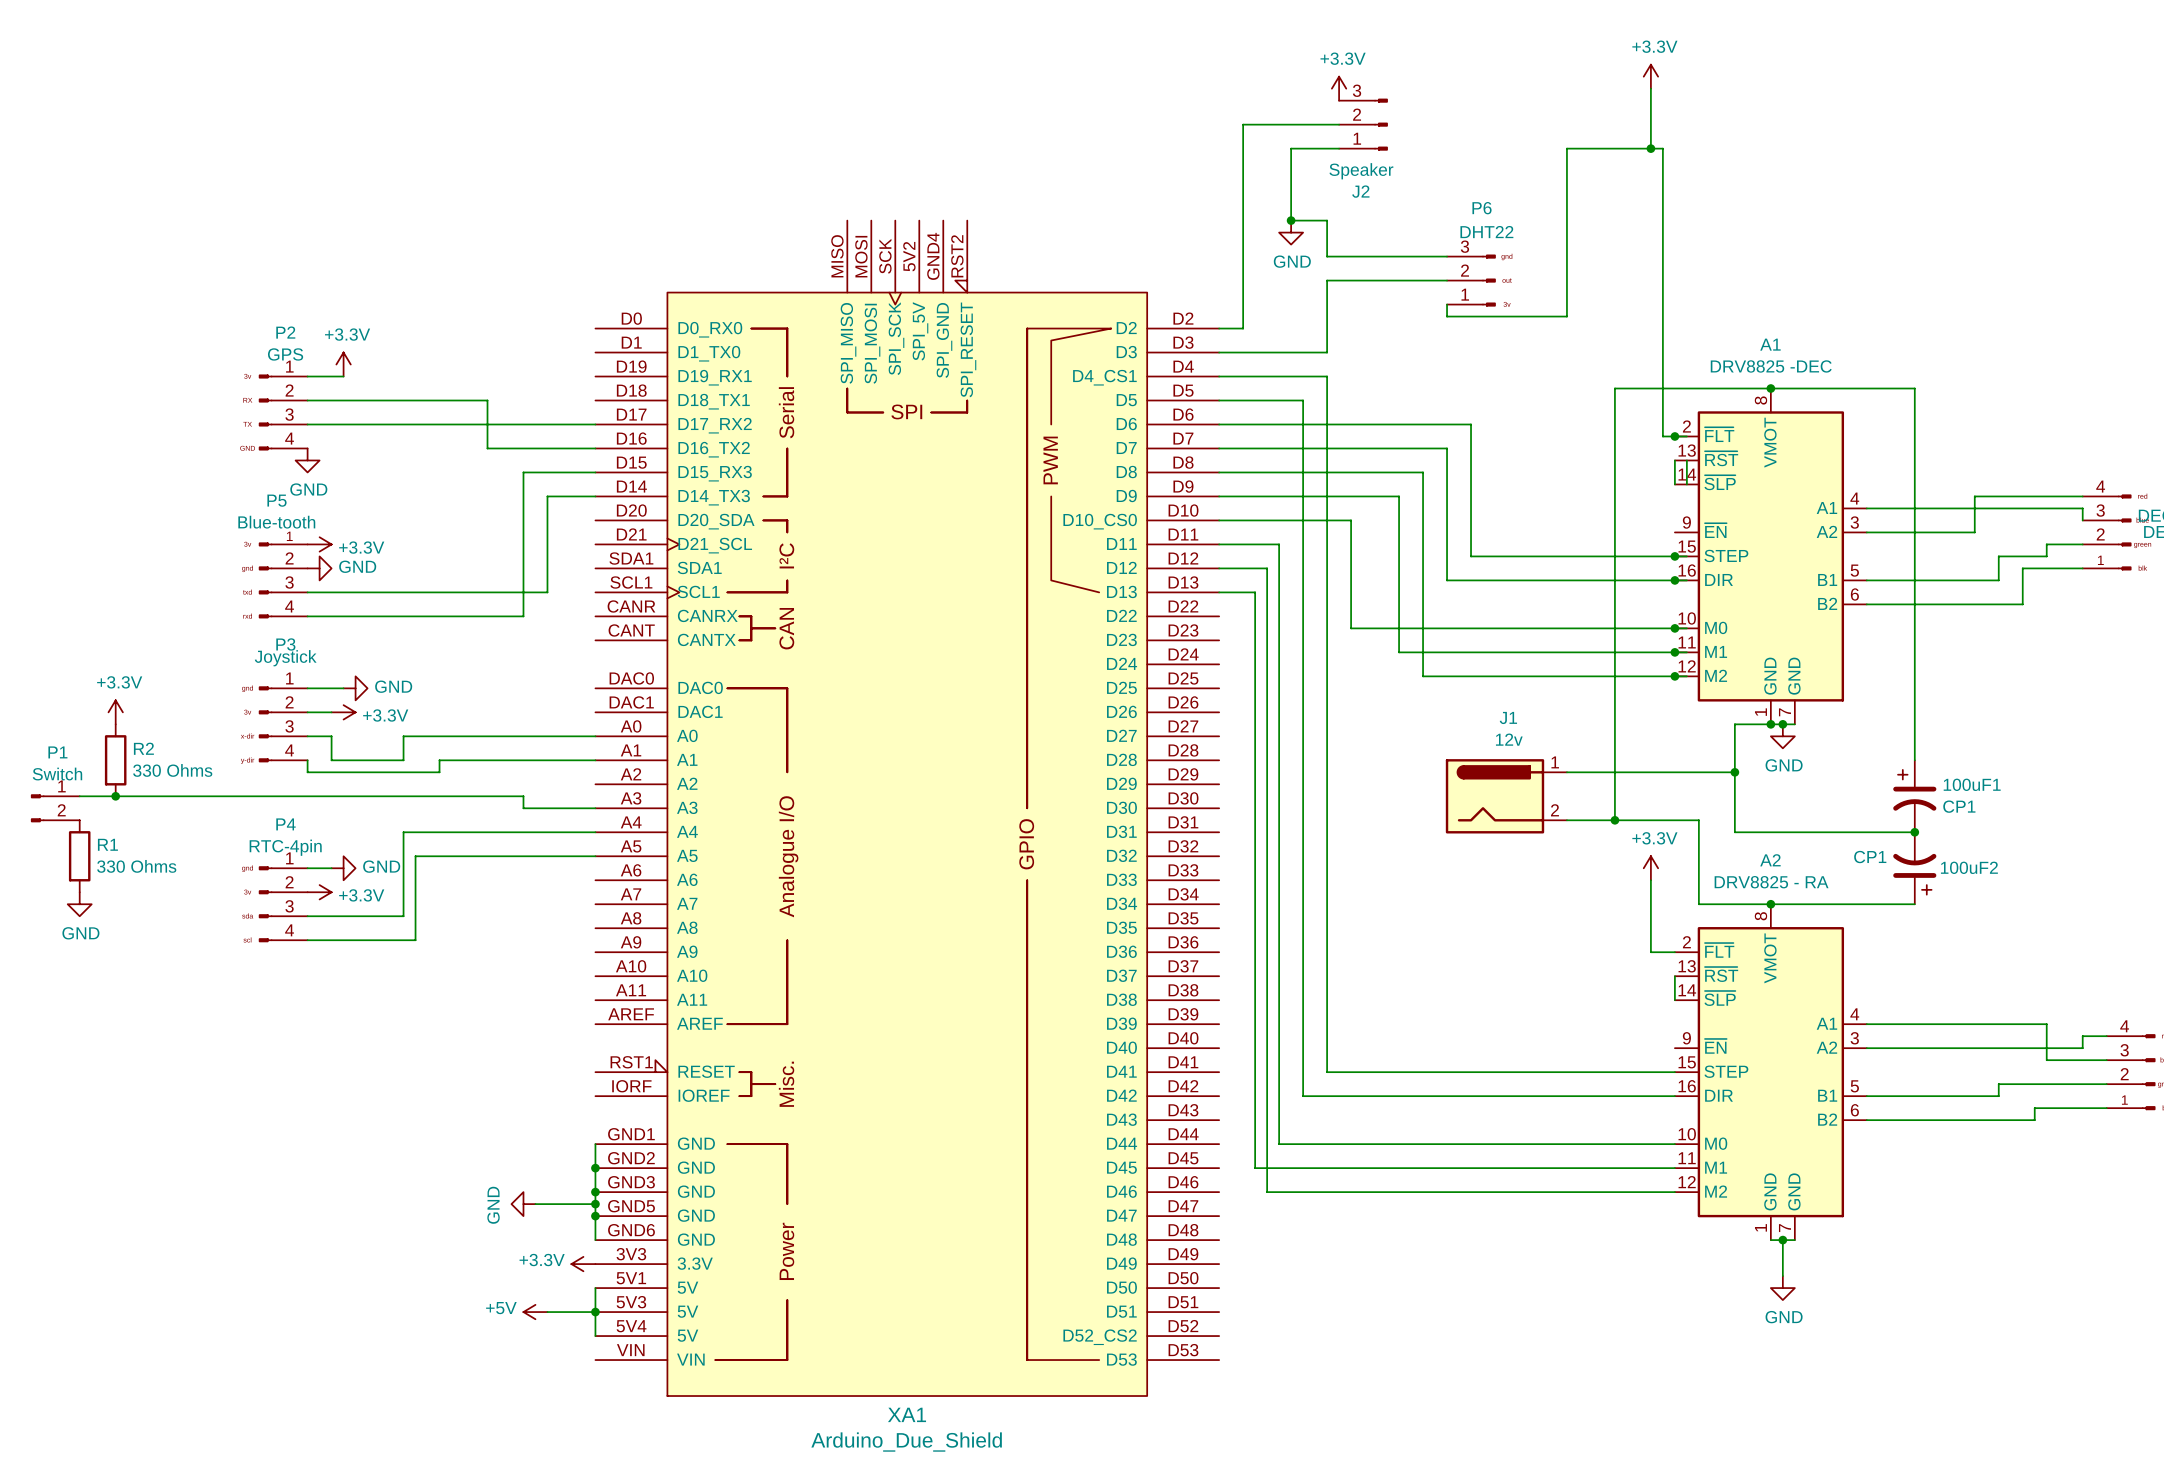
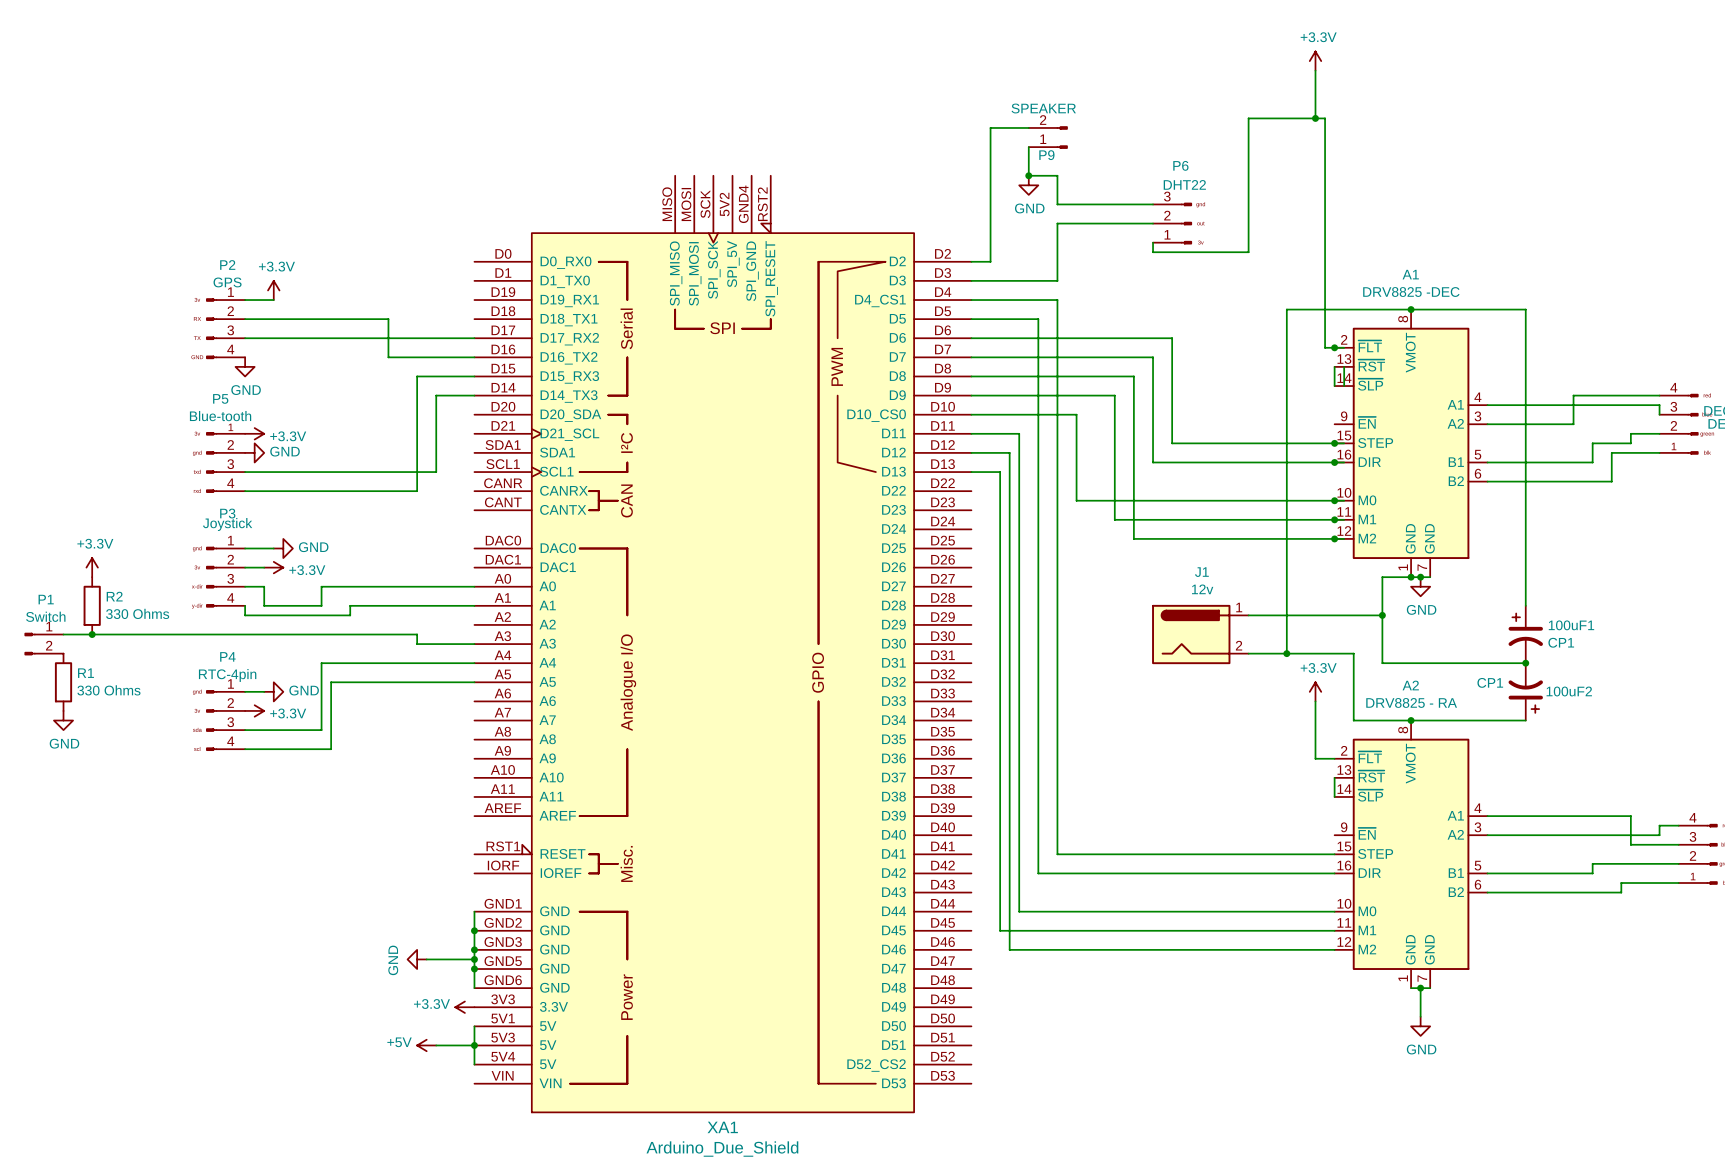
power symbol: +3.3V (1339, 88) -> none
wire: (1339, 124) (1243, 124) (1243, 160) -> (1028, 127) (990, 127)
J2: Speaker (1363, 124) -> none
wire: (1339, 148) (1291, 148) (1291, 184) -> none
P9: none -> SPEAKER (1048, 137)

